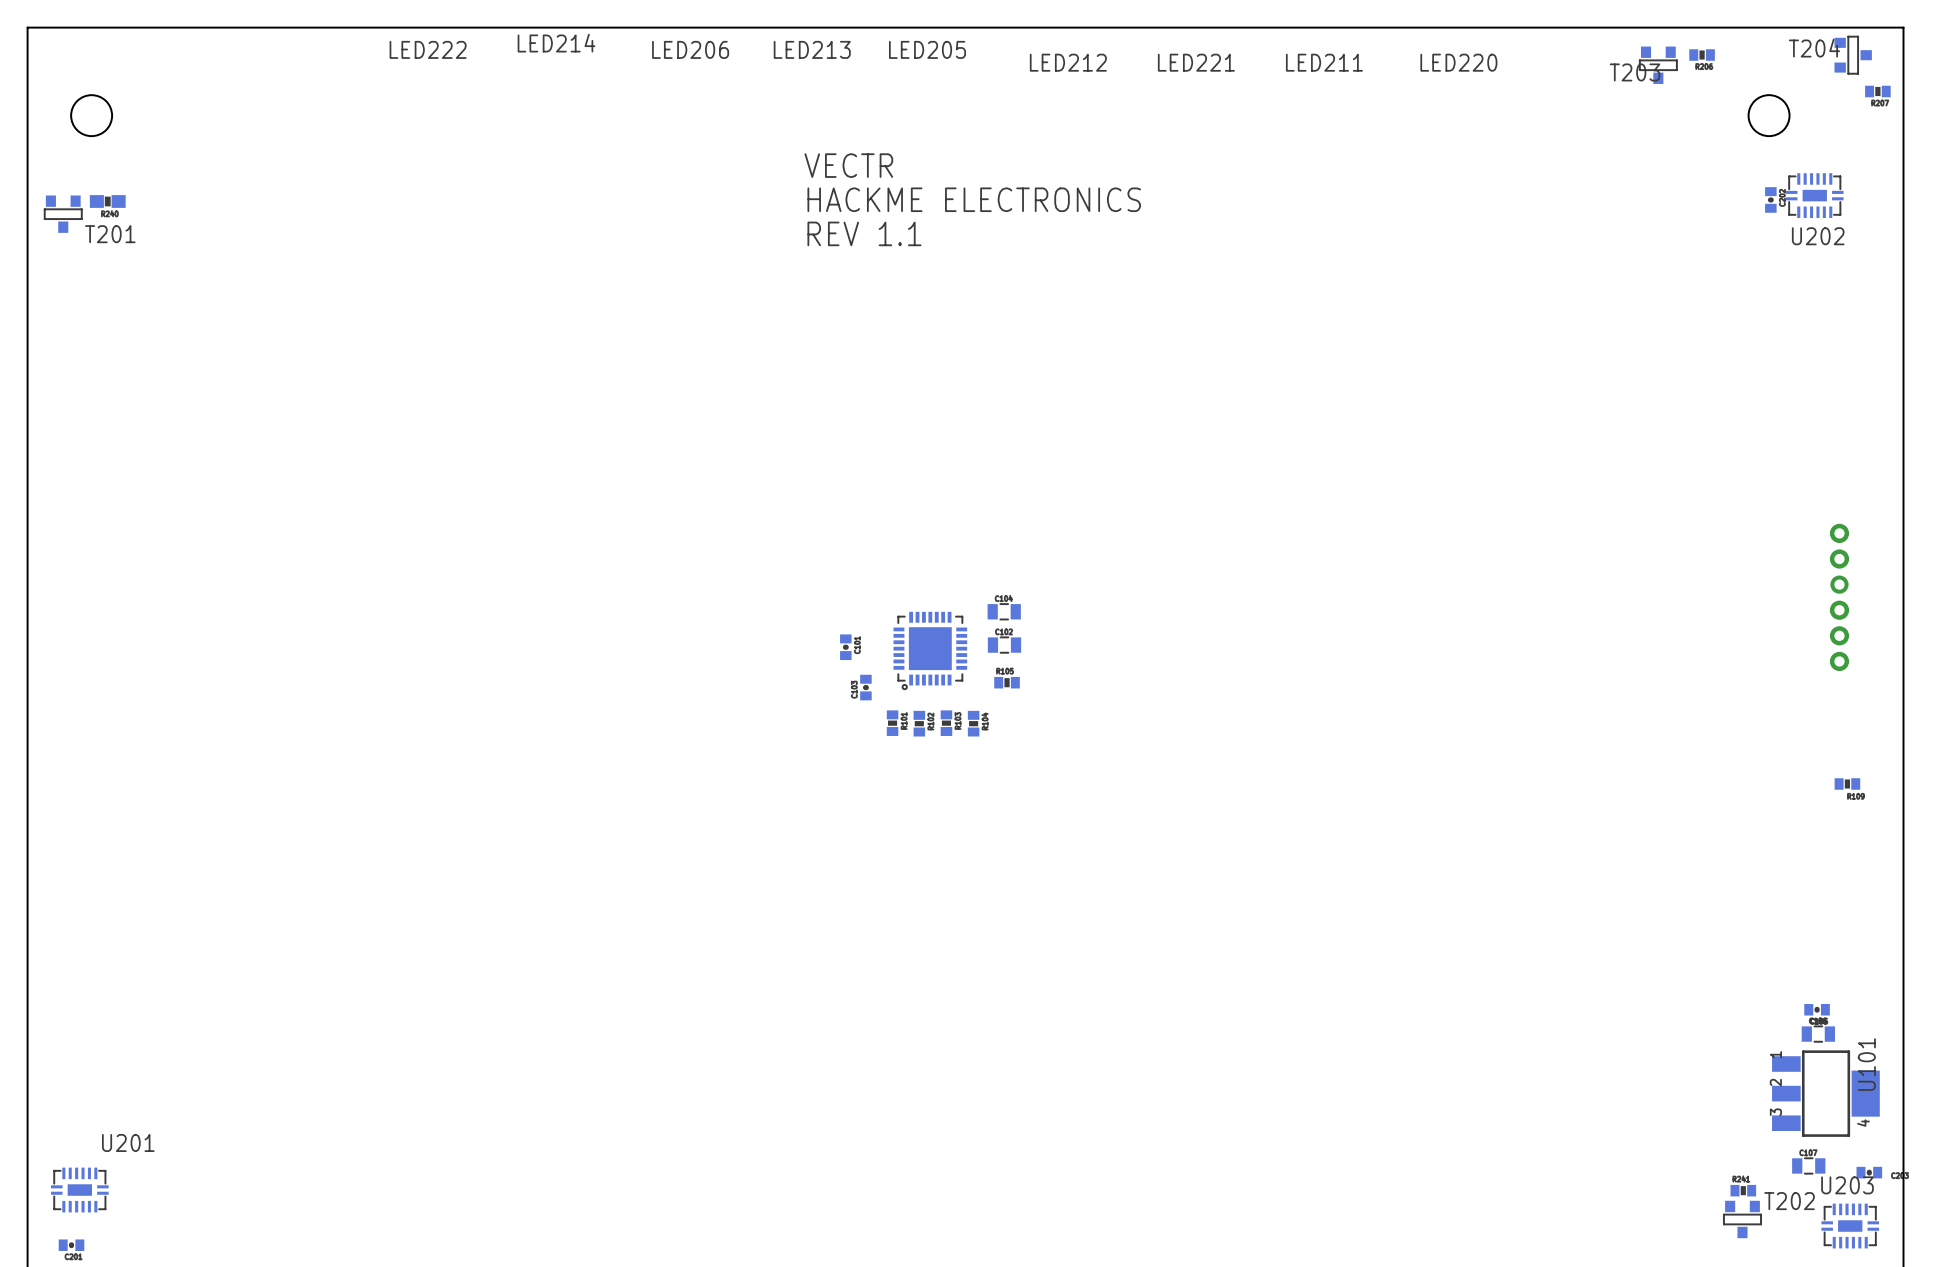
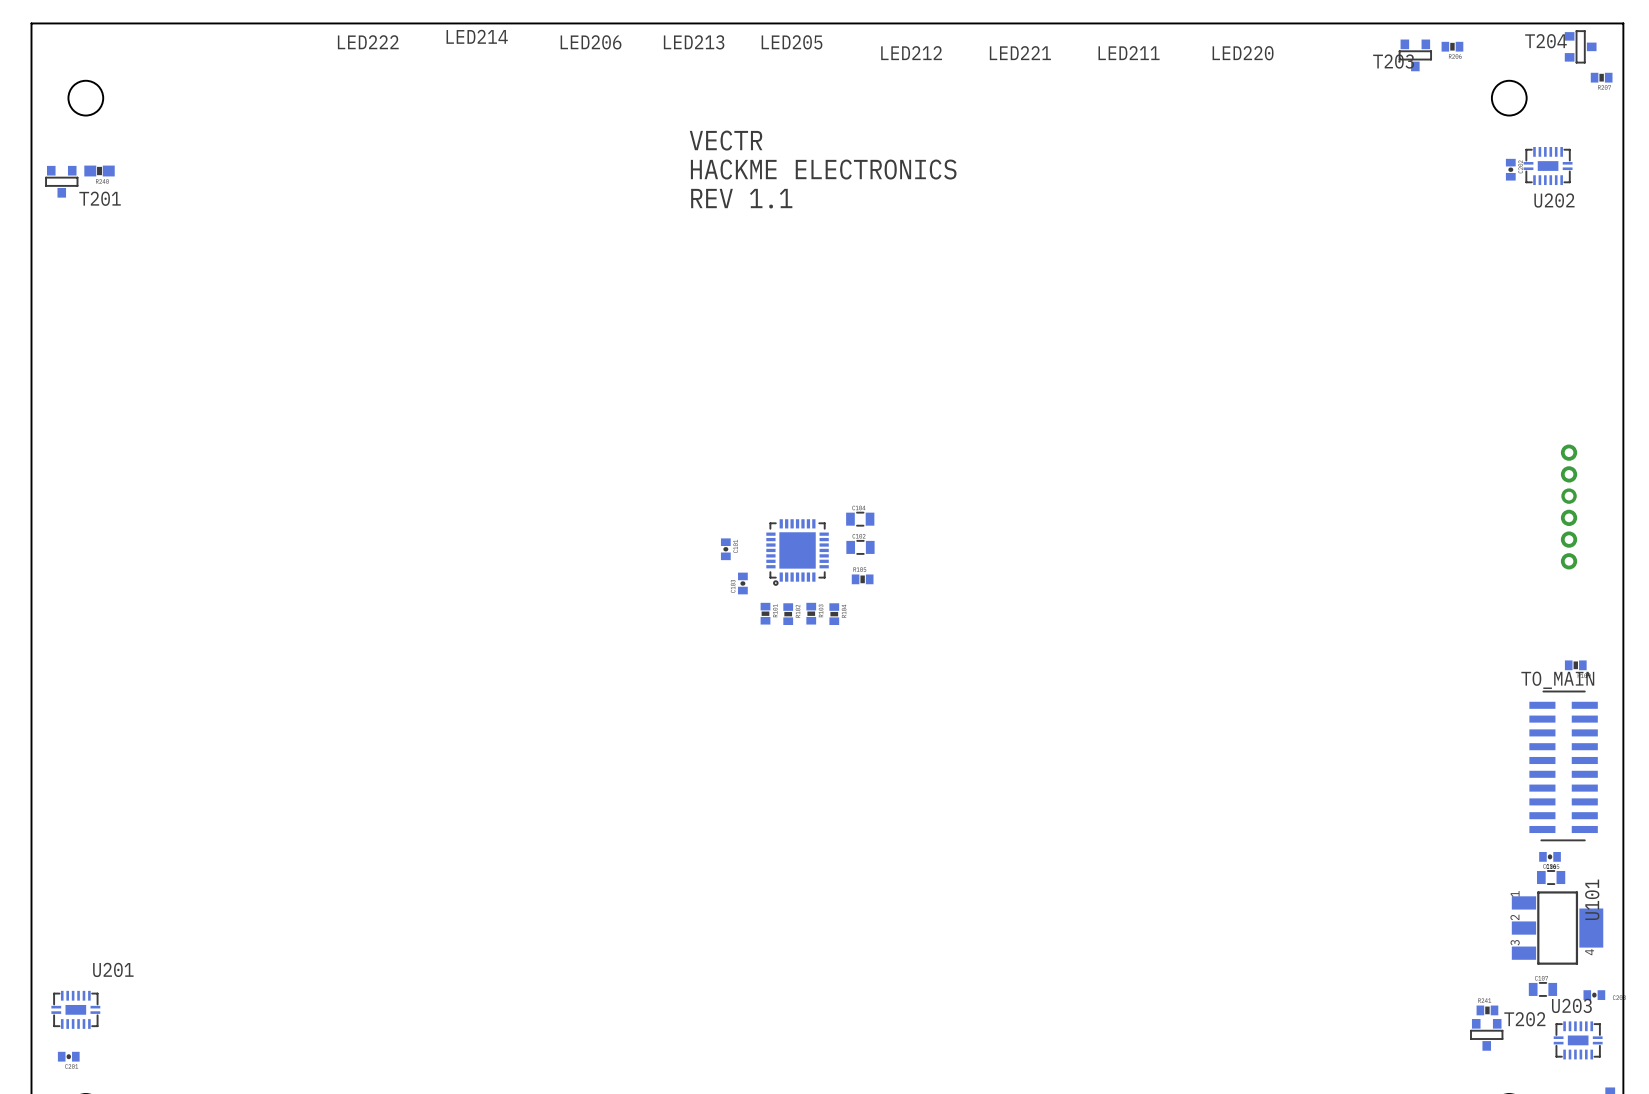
TO_MAIN: none -> (1563, 765)

